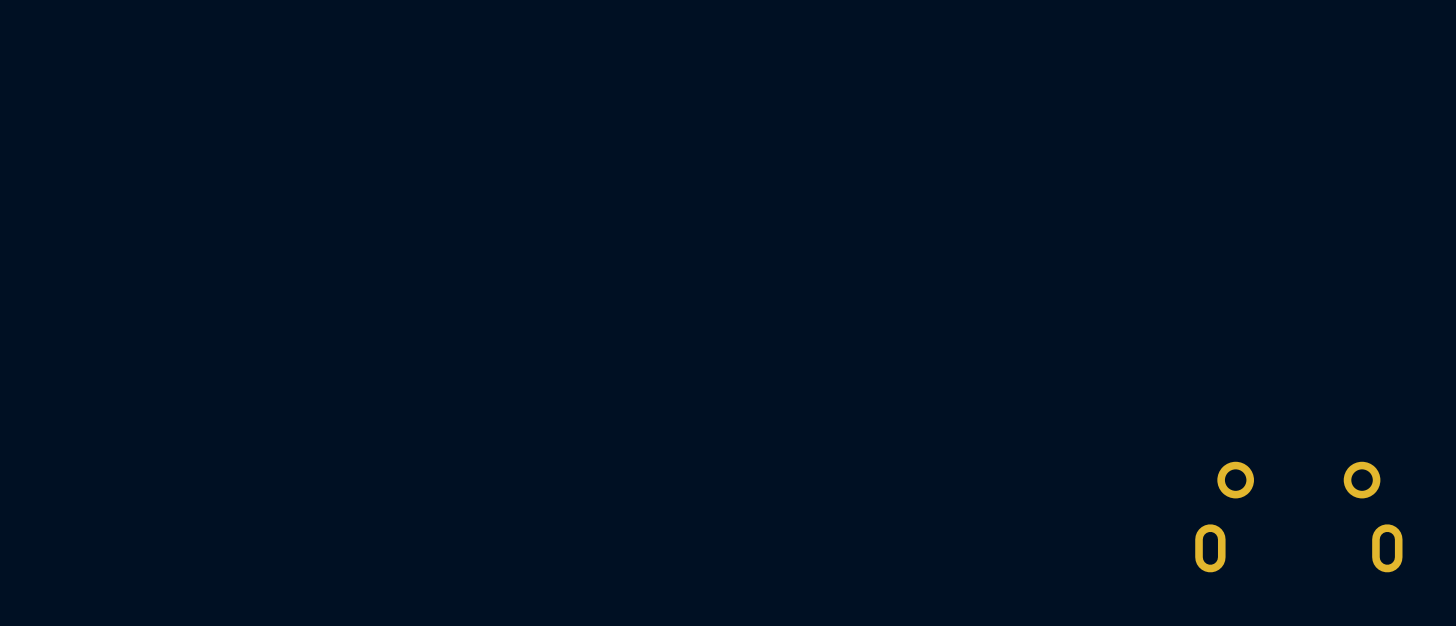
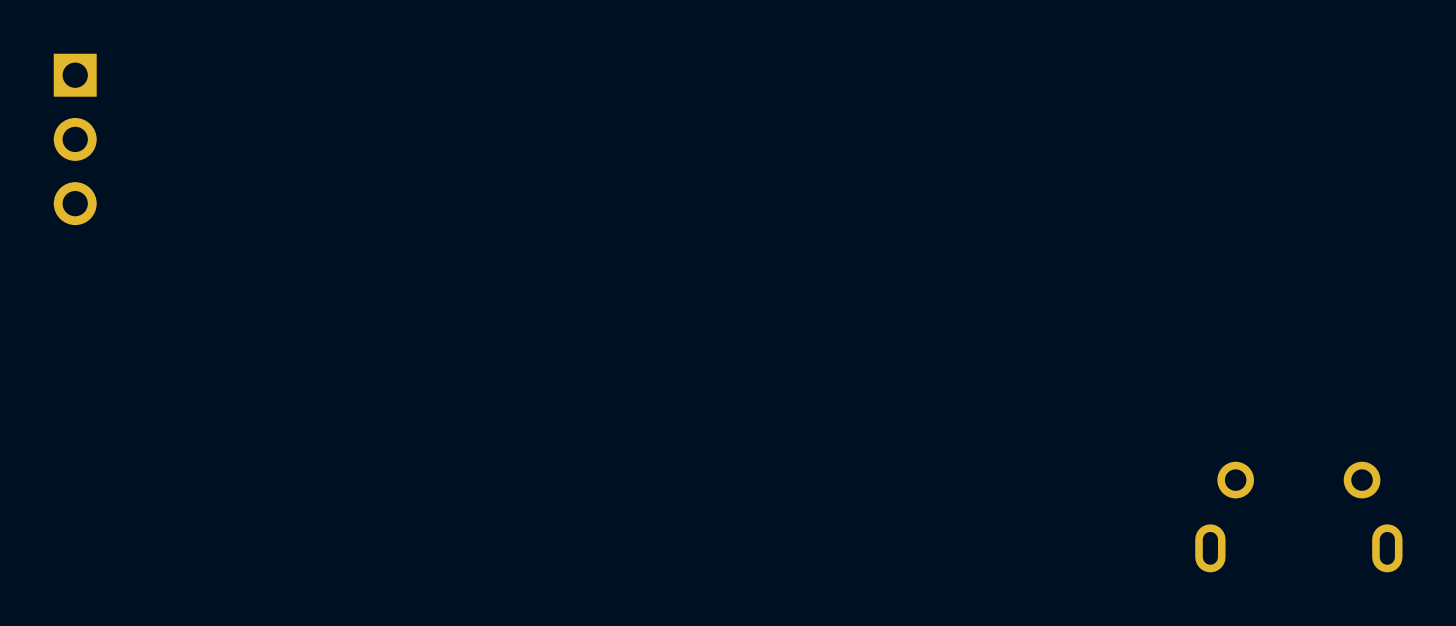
part: none -> (75, 139)

